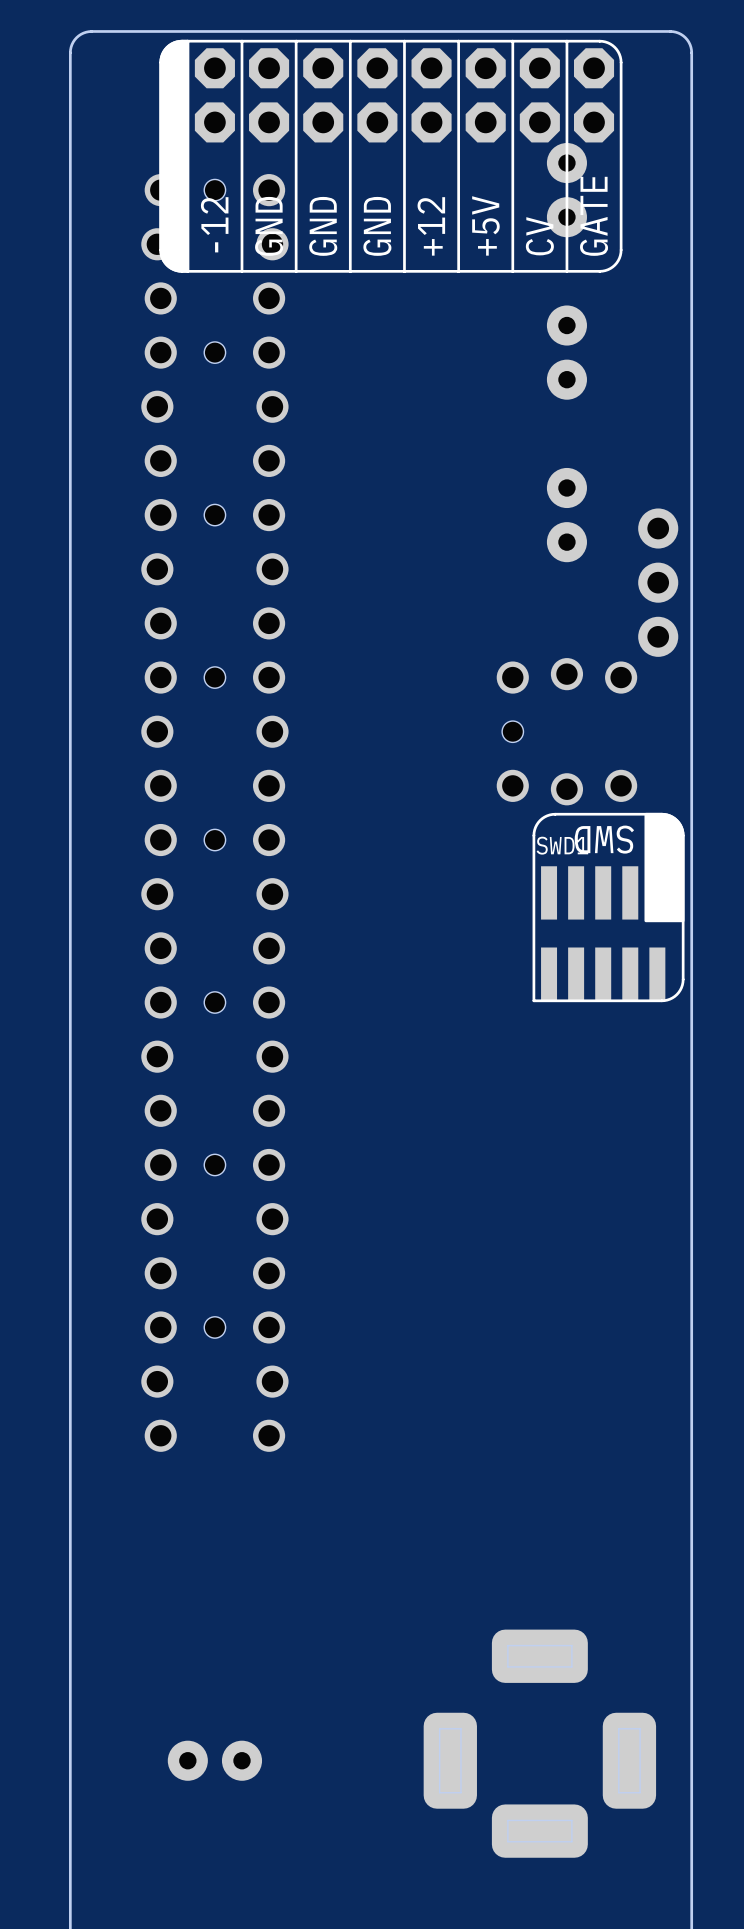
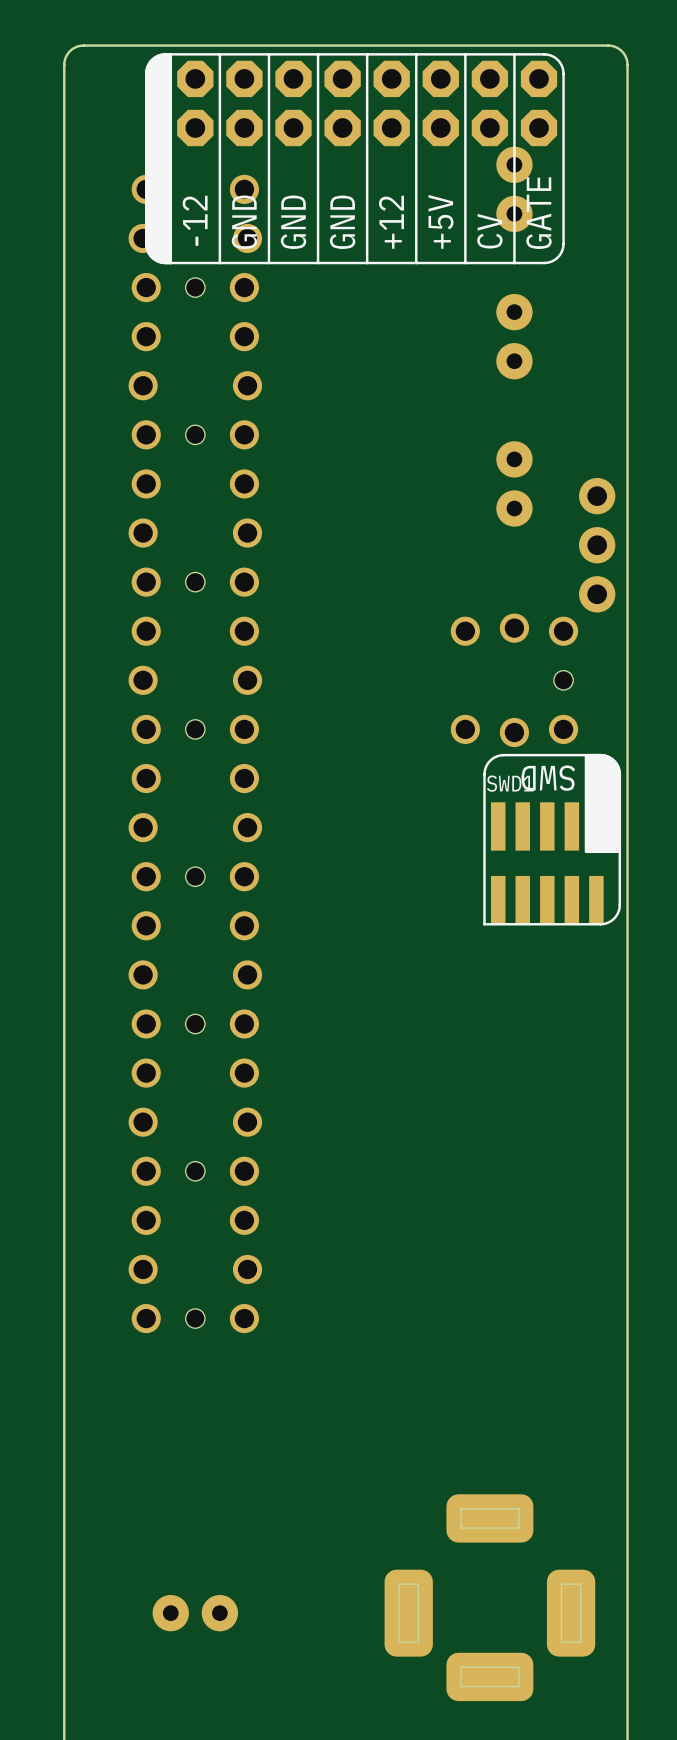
part rotation: 0° (214, 244) -> 180° (195, 238)
part rotation: 0° (214, 406) -> 180° (195, 385)
part rotation: 0° (214, 569) -> 180° (195, 533)
part rotation: 0° (214, 731) -> 180° (195, 680)
part rotation: 0° (566, 731) -> 180° (514, 680)
part rotation: 0° (214, 894) -> 180° (195, 827)
part rotation: 0° (214, 1056) -> 180° (195, 974)
part rotation: 0° (214, 1219) -> 180° (195, 1122)
part rotation: 0° (214, 1381) -> 180° (195, 1269)

